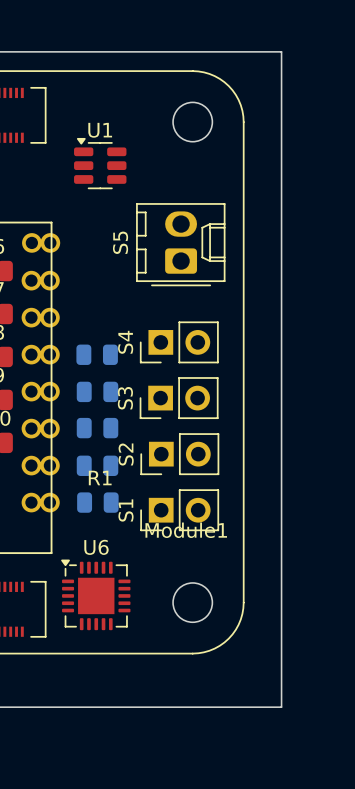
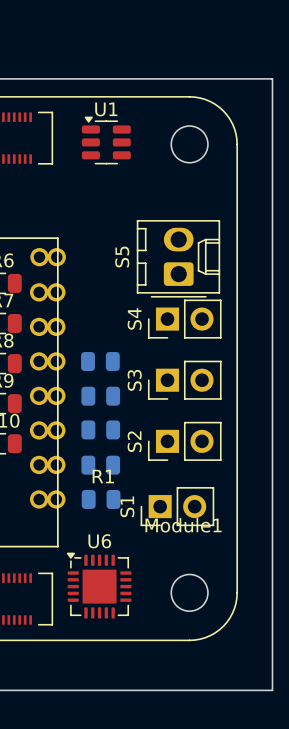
U1 position: (100, 163) -> (106, 140)
S4 position: (179, 342) -> (184, 319)
S3 position: (179, 398) -> (184, 380)
S2 position: (179, 454) -> (184, 441)

